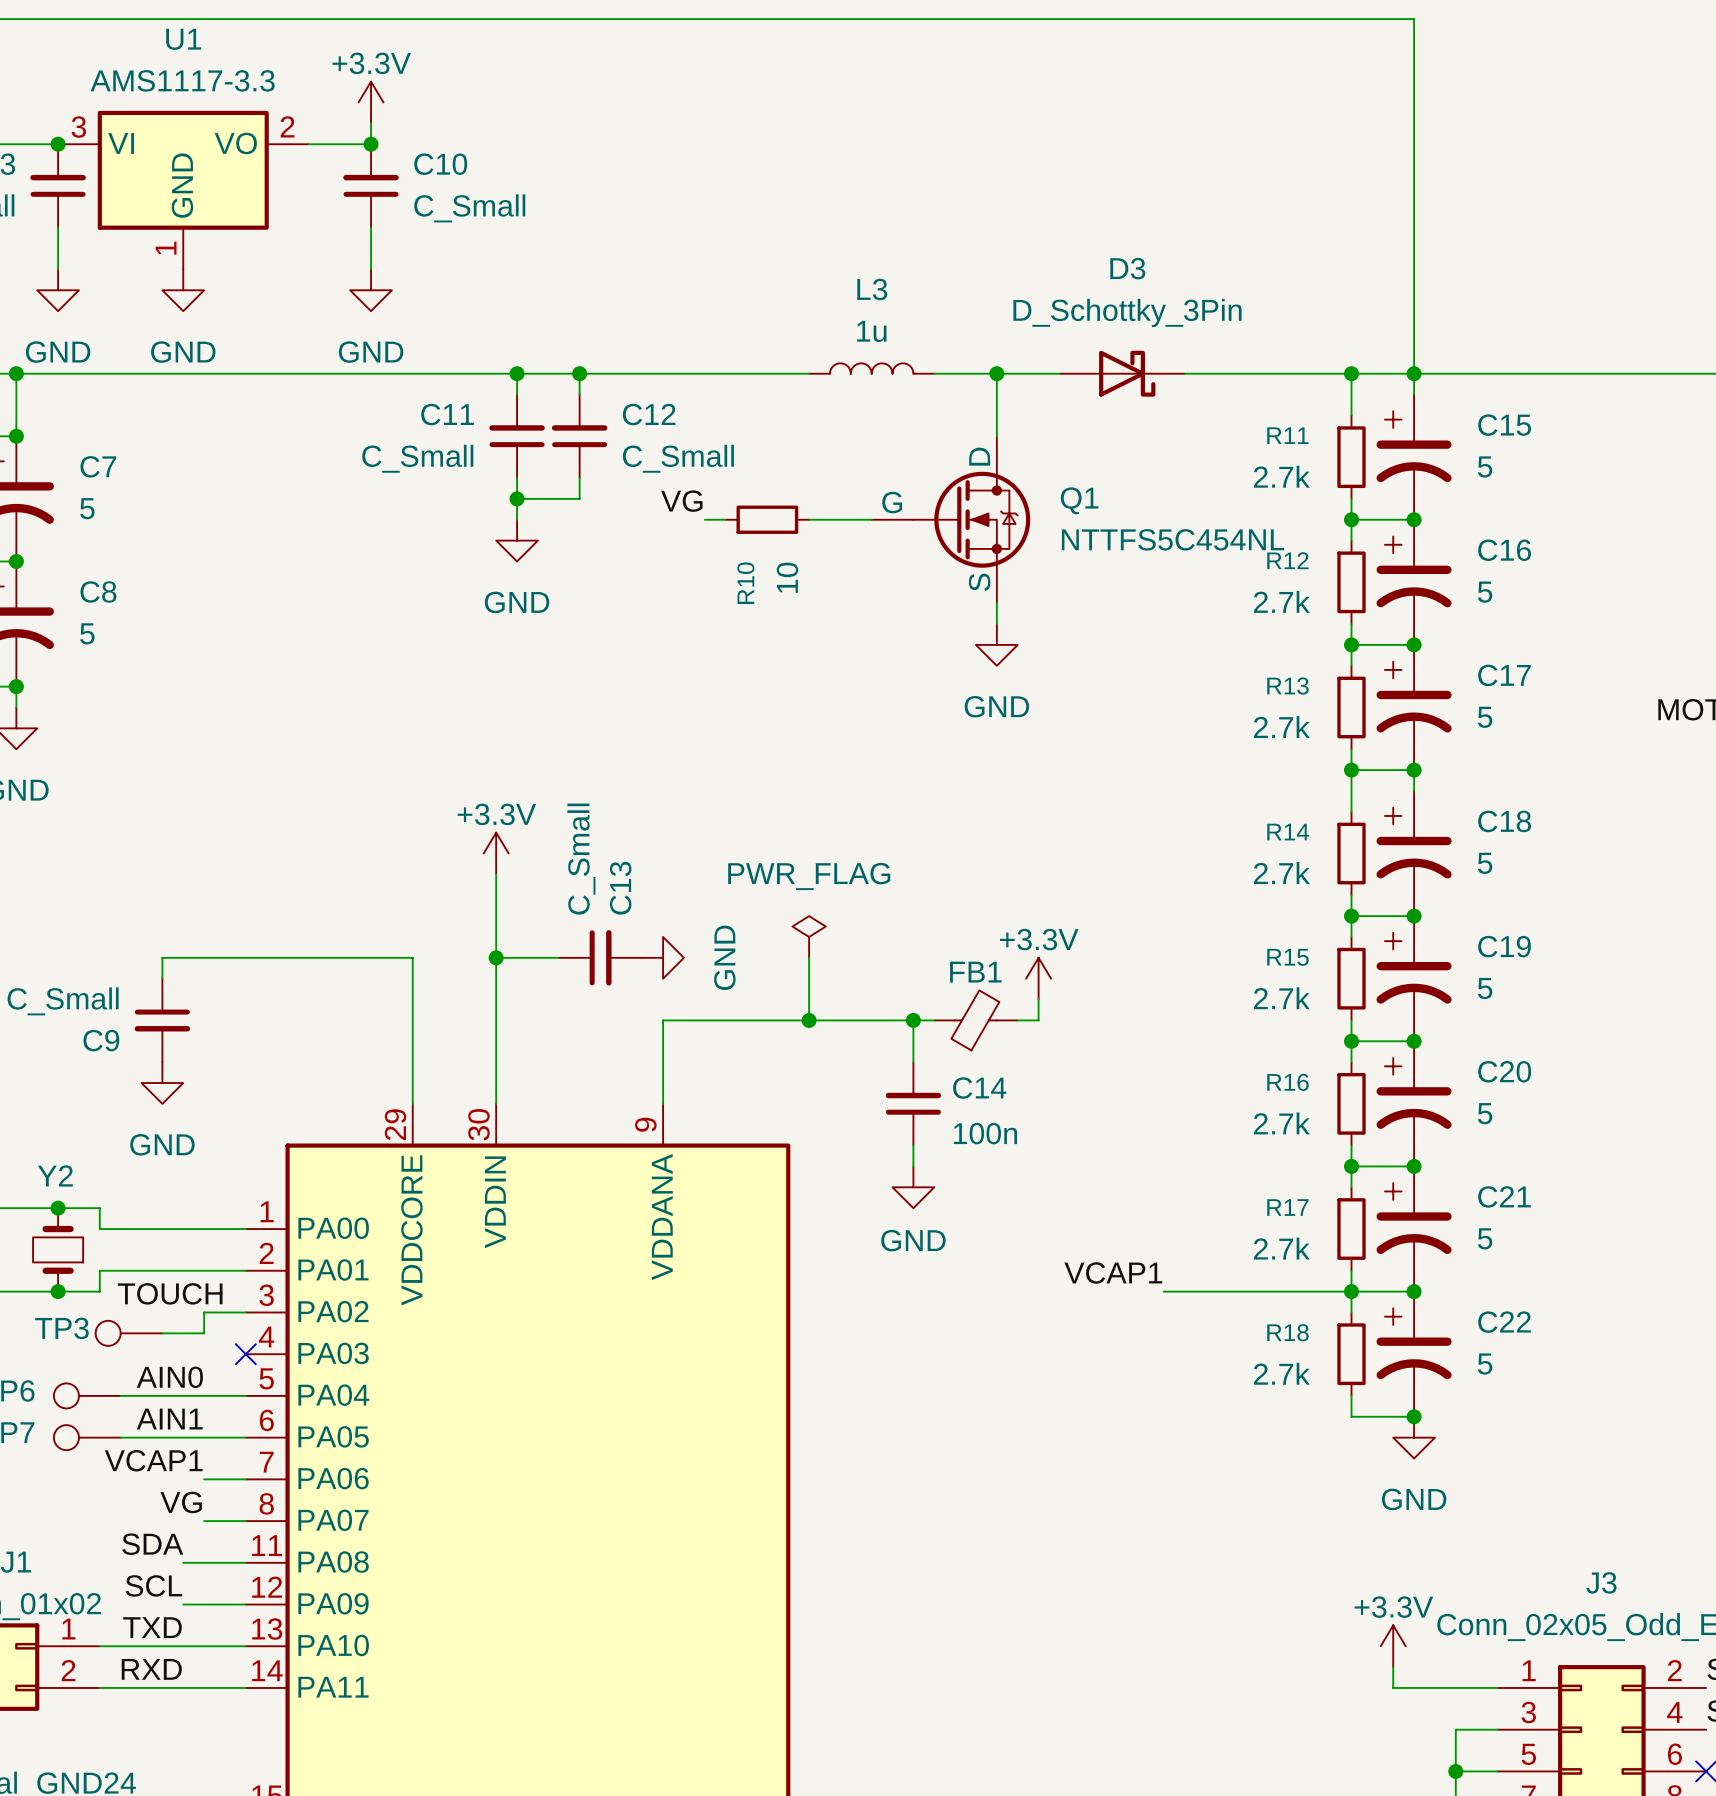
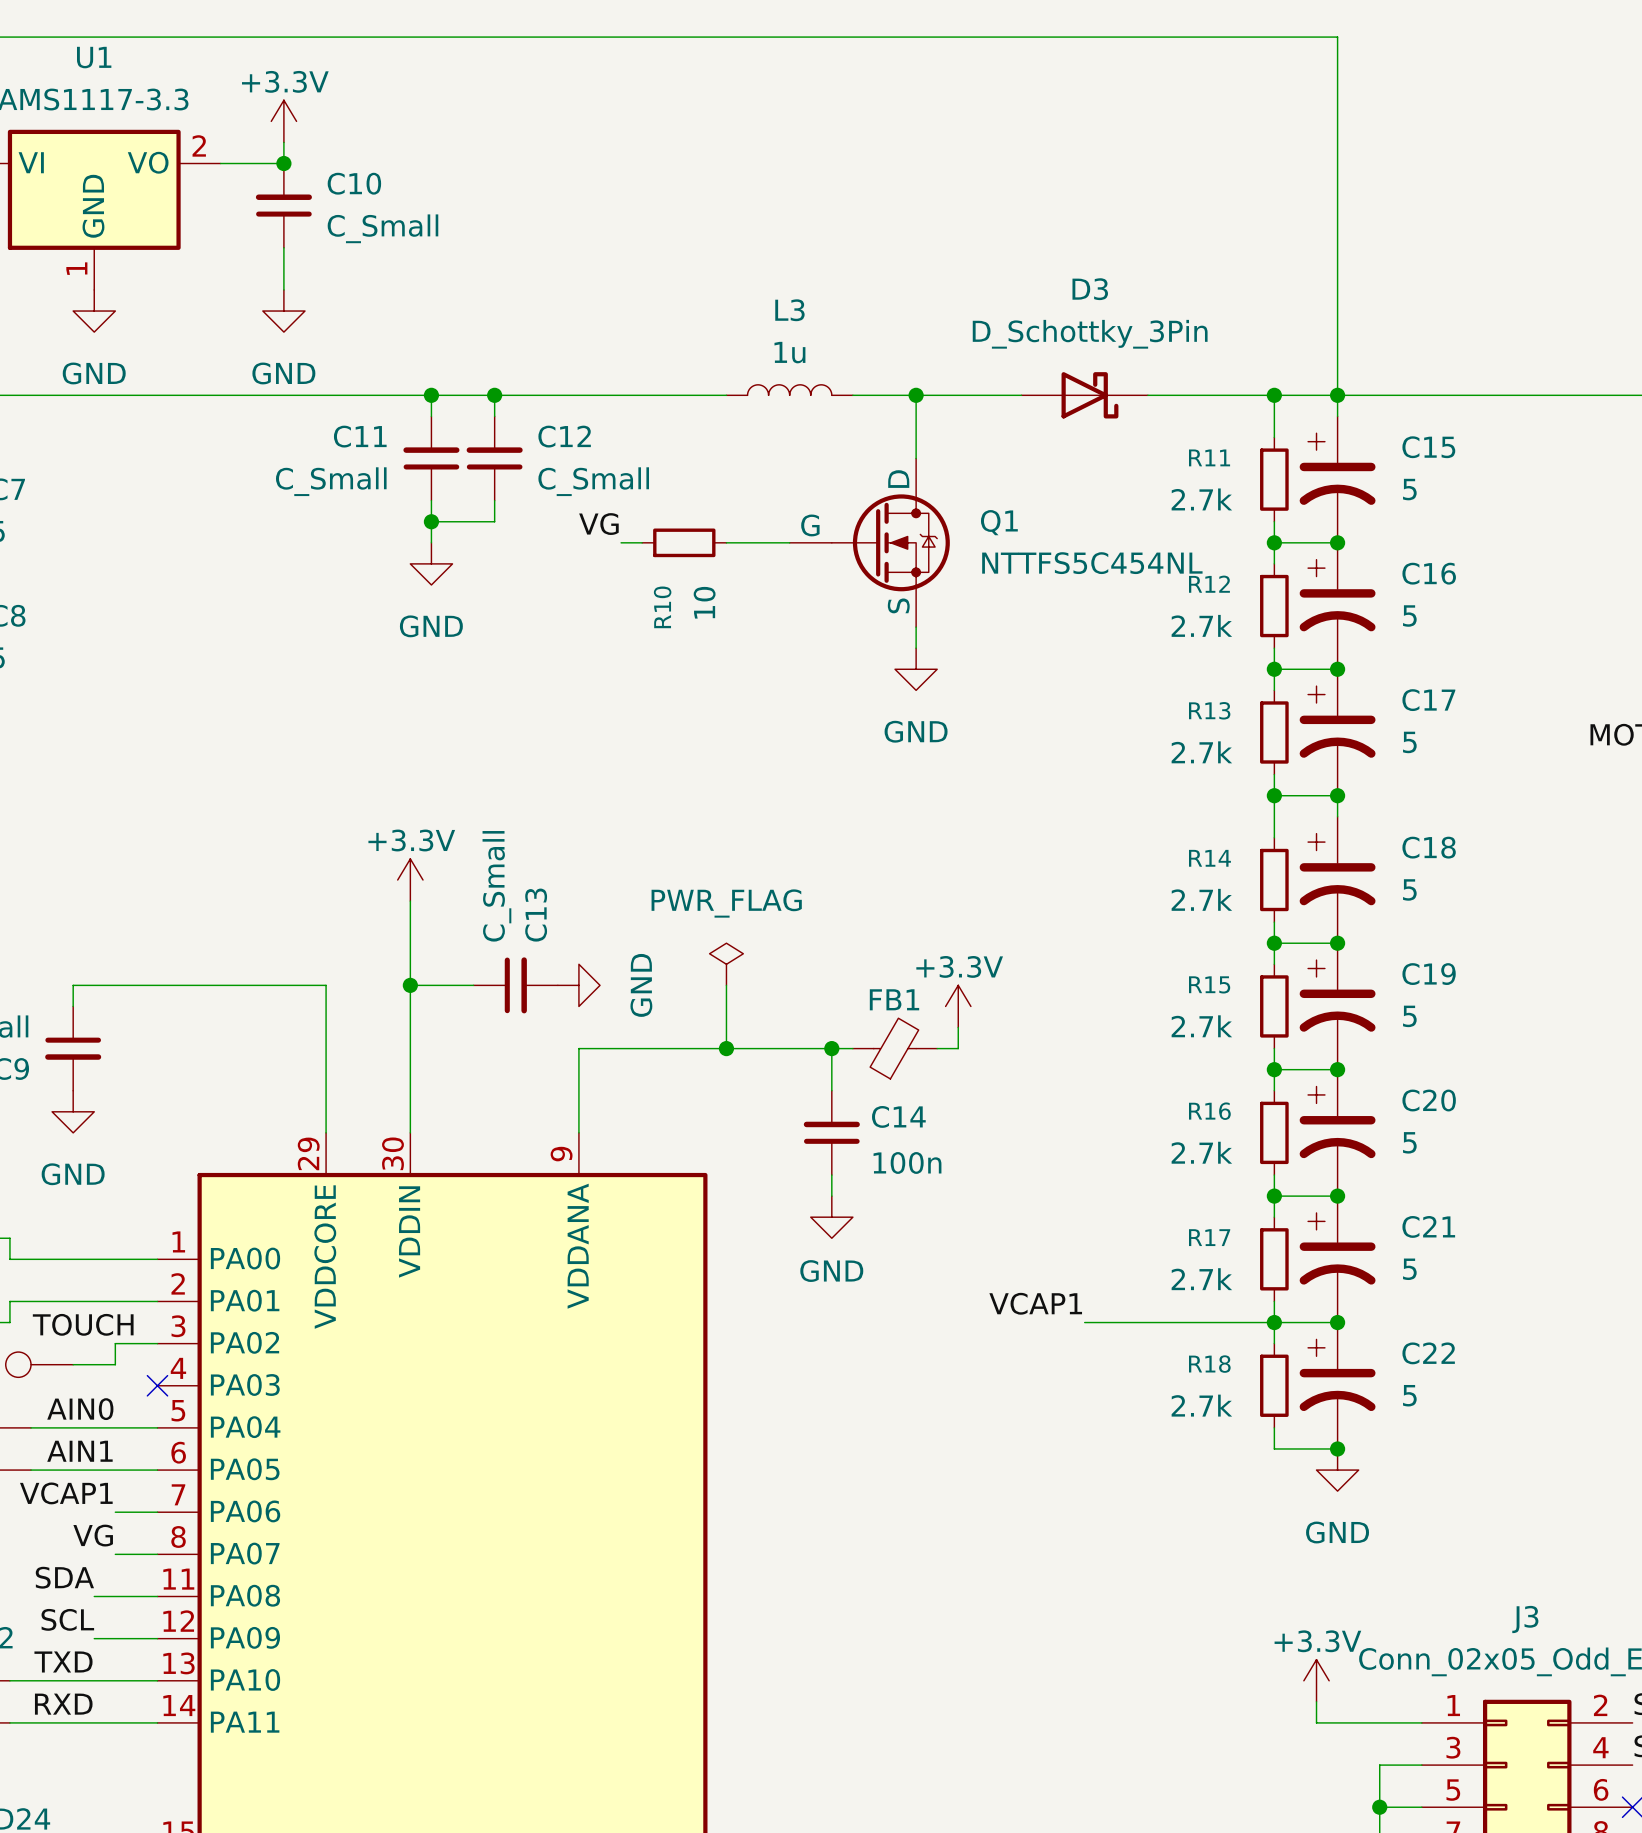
D3 position: (1122, 373) -> (1084, 395)

